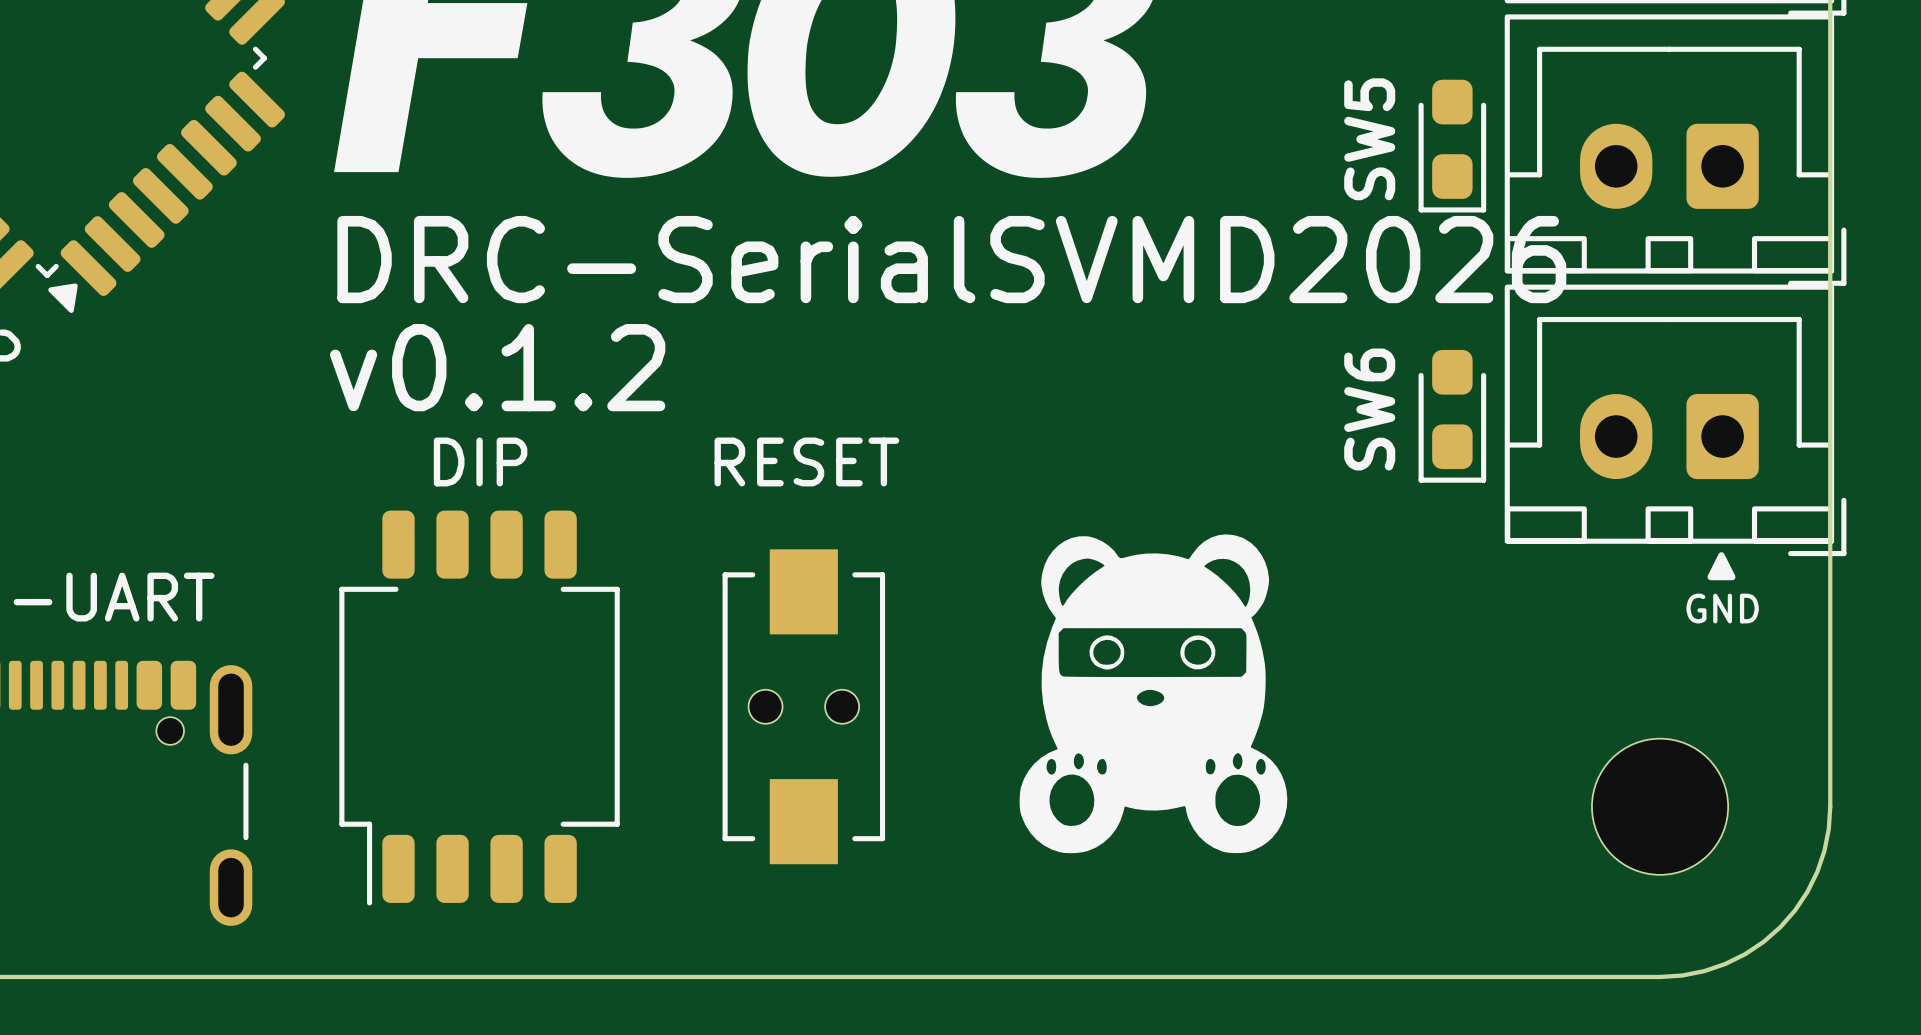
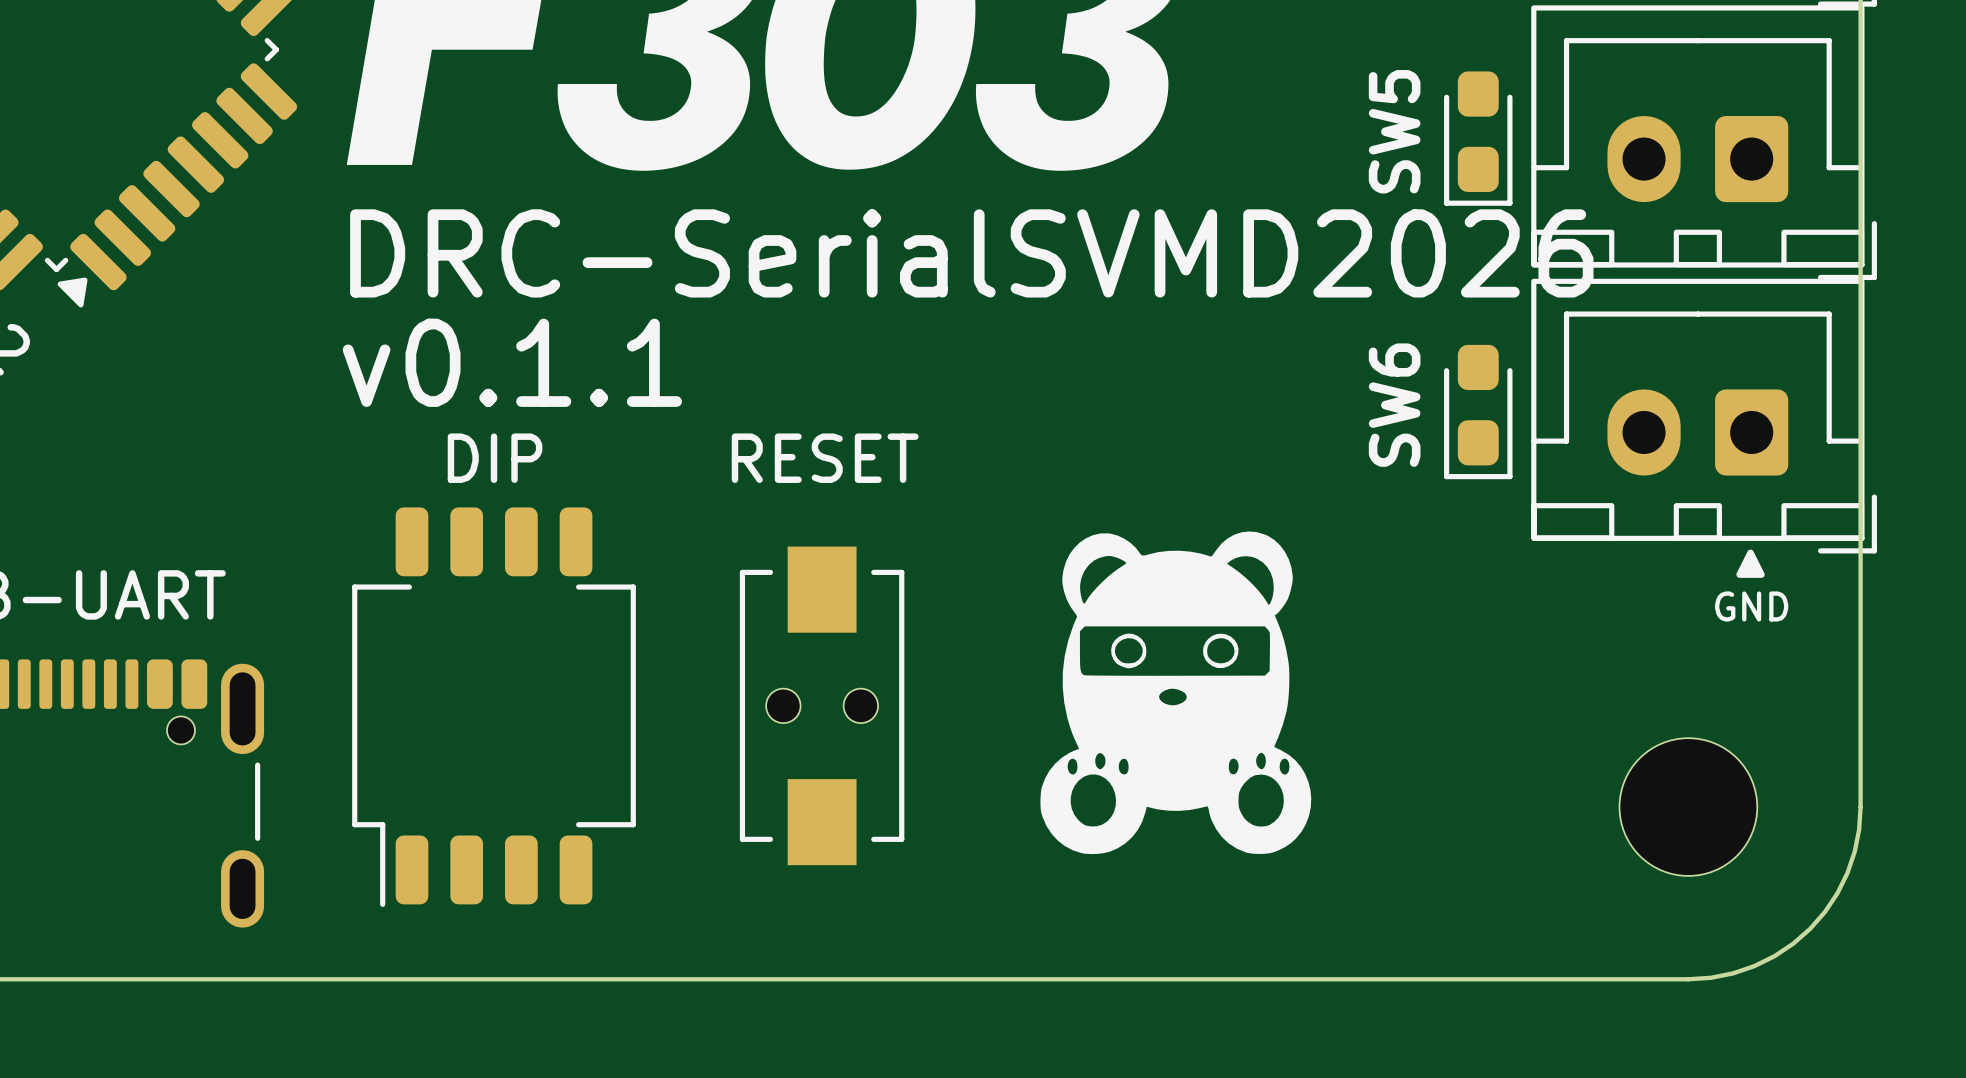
text: v0.1.2 (497, 367) -> v0.1.1 (512, 362)

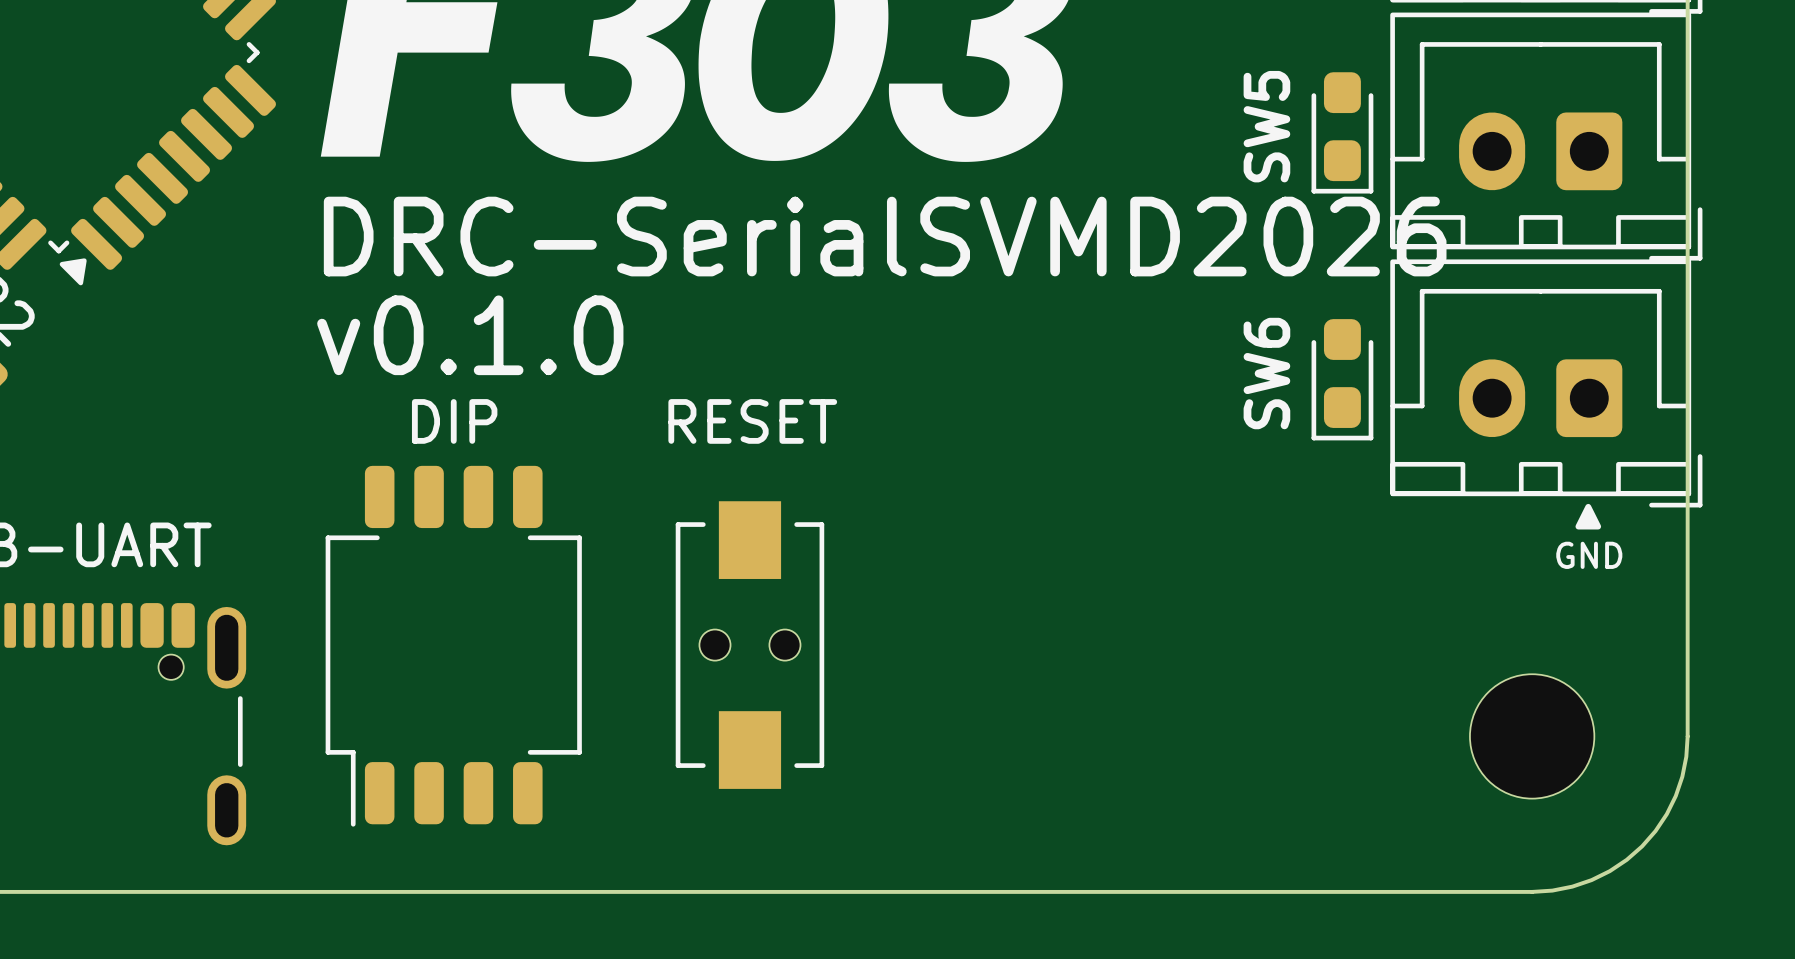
text: v0.1.1 (512, 362) -> v0.1.0 (470, 335)
drawing: [1040, 531, 1312, 855] -> none

